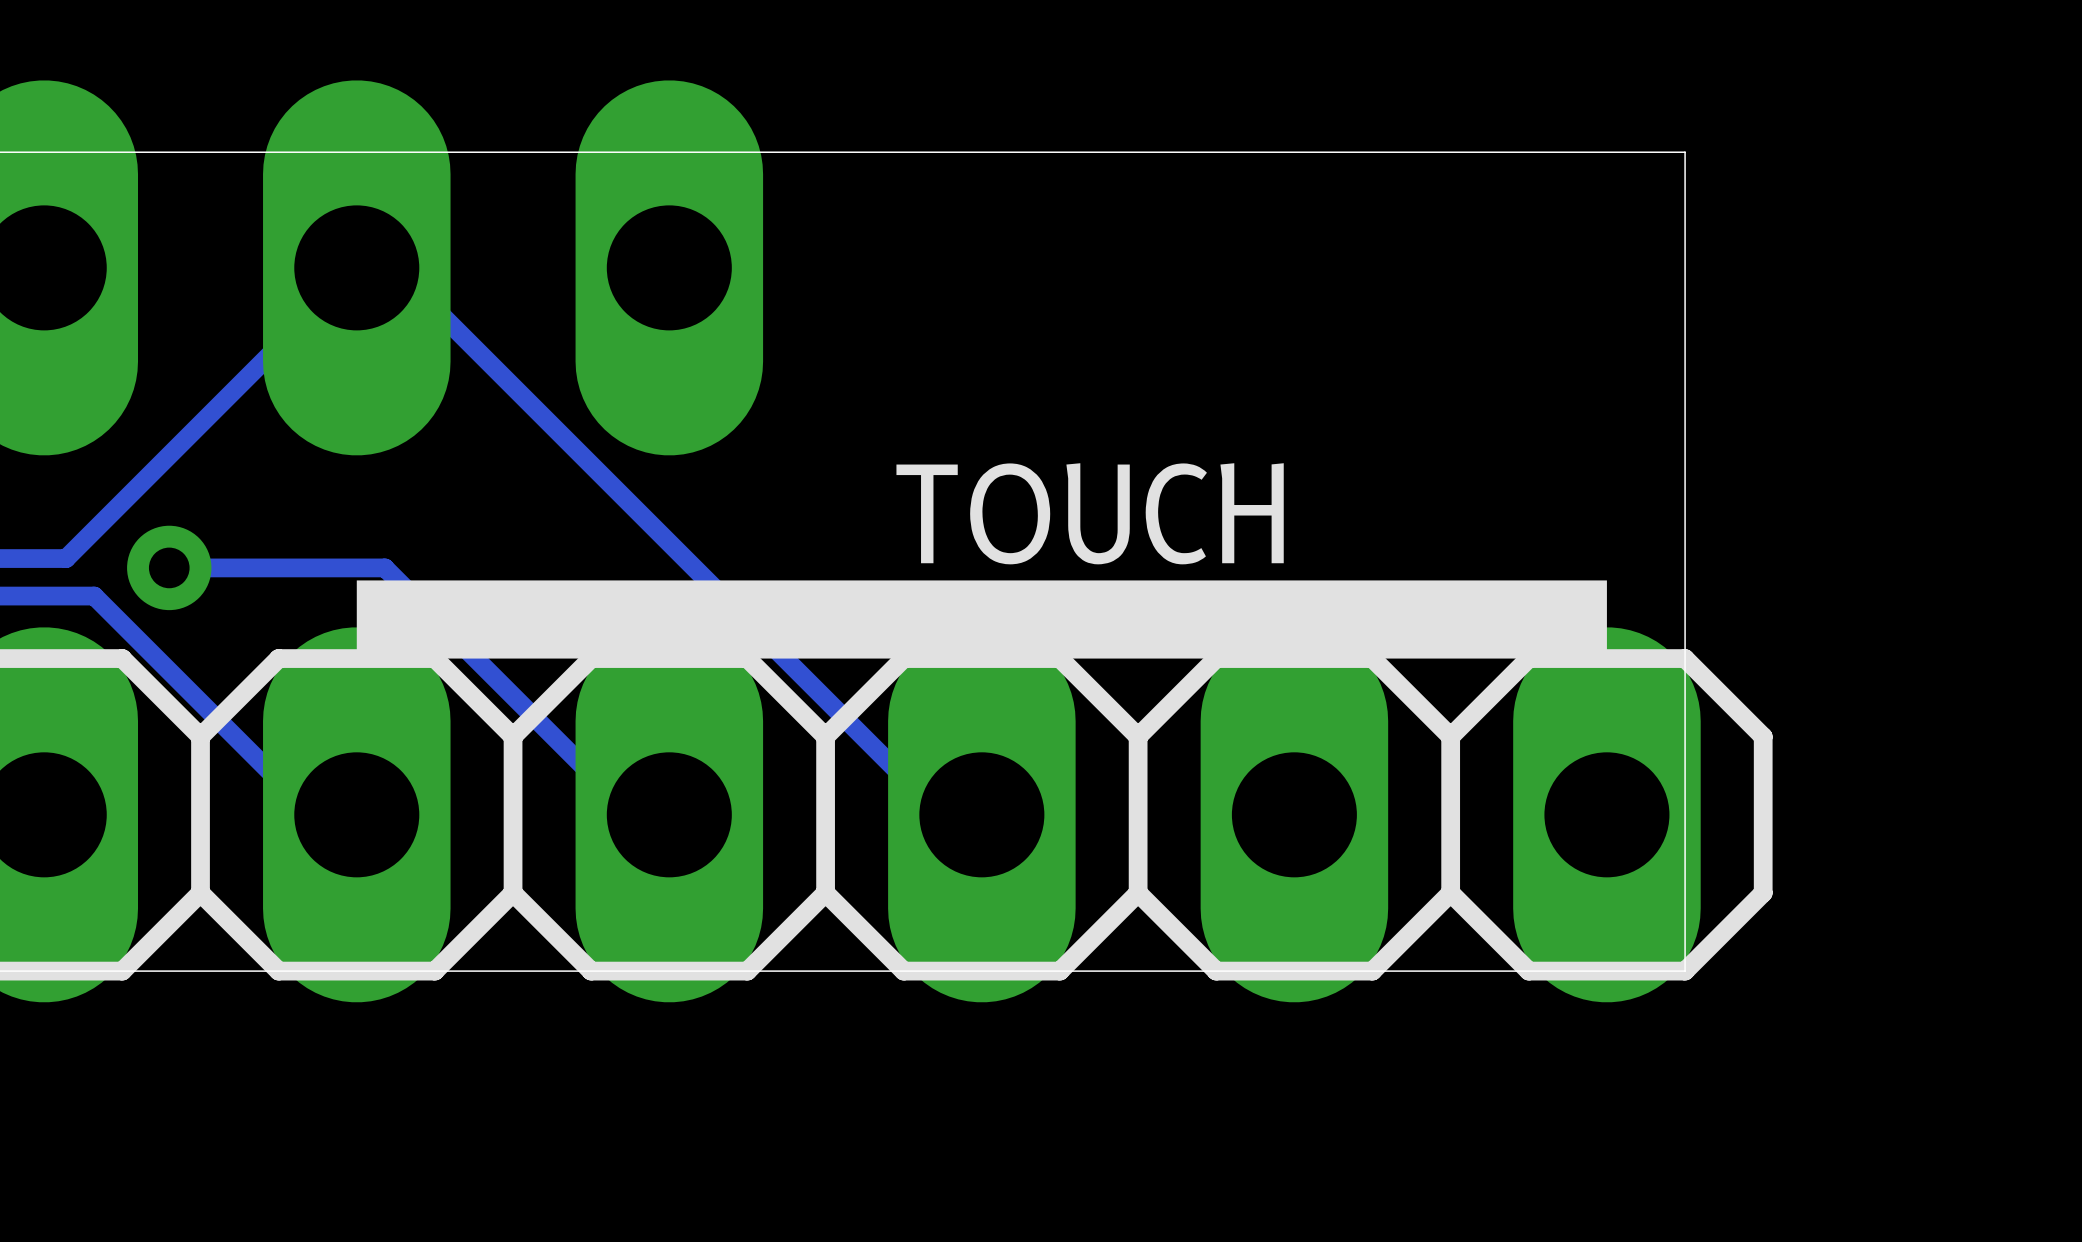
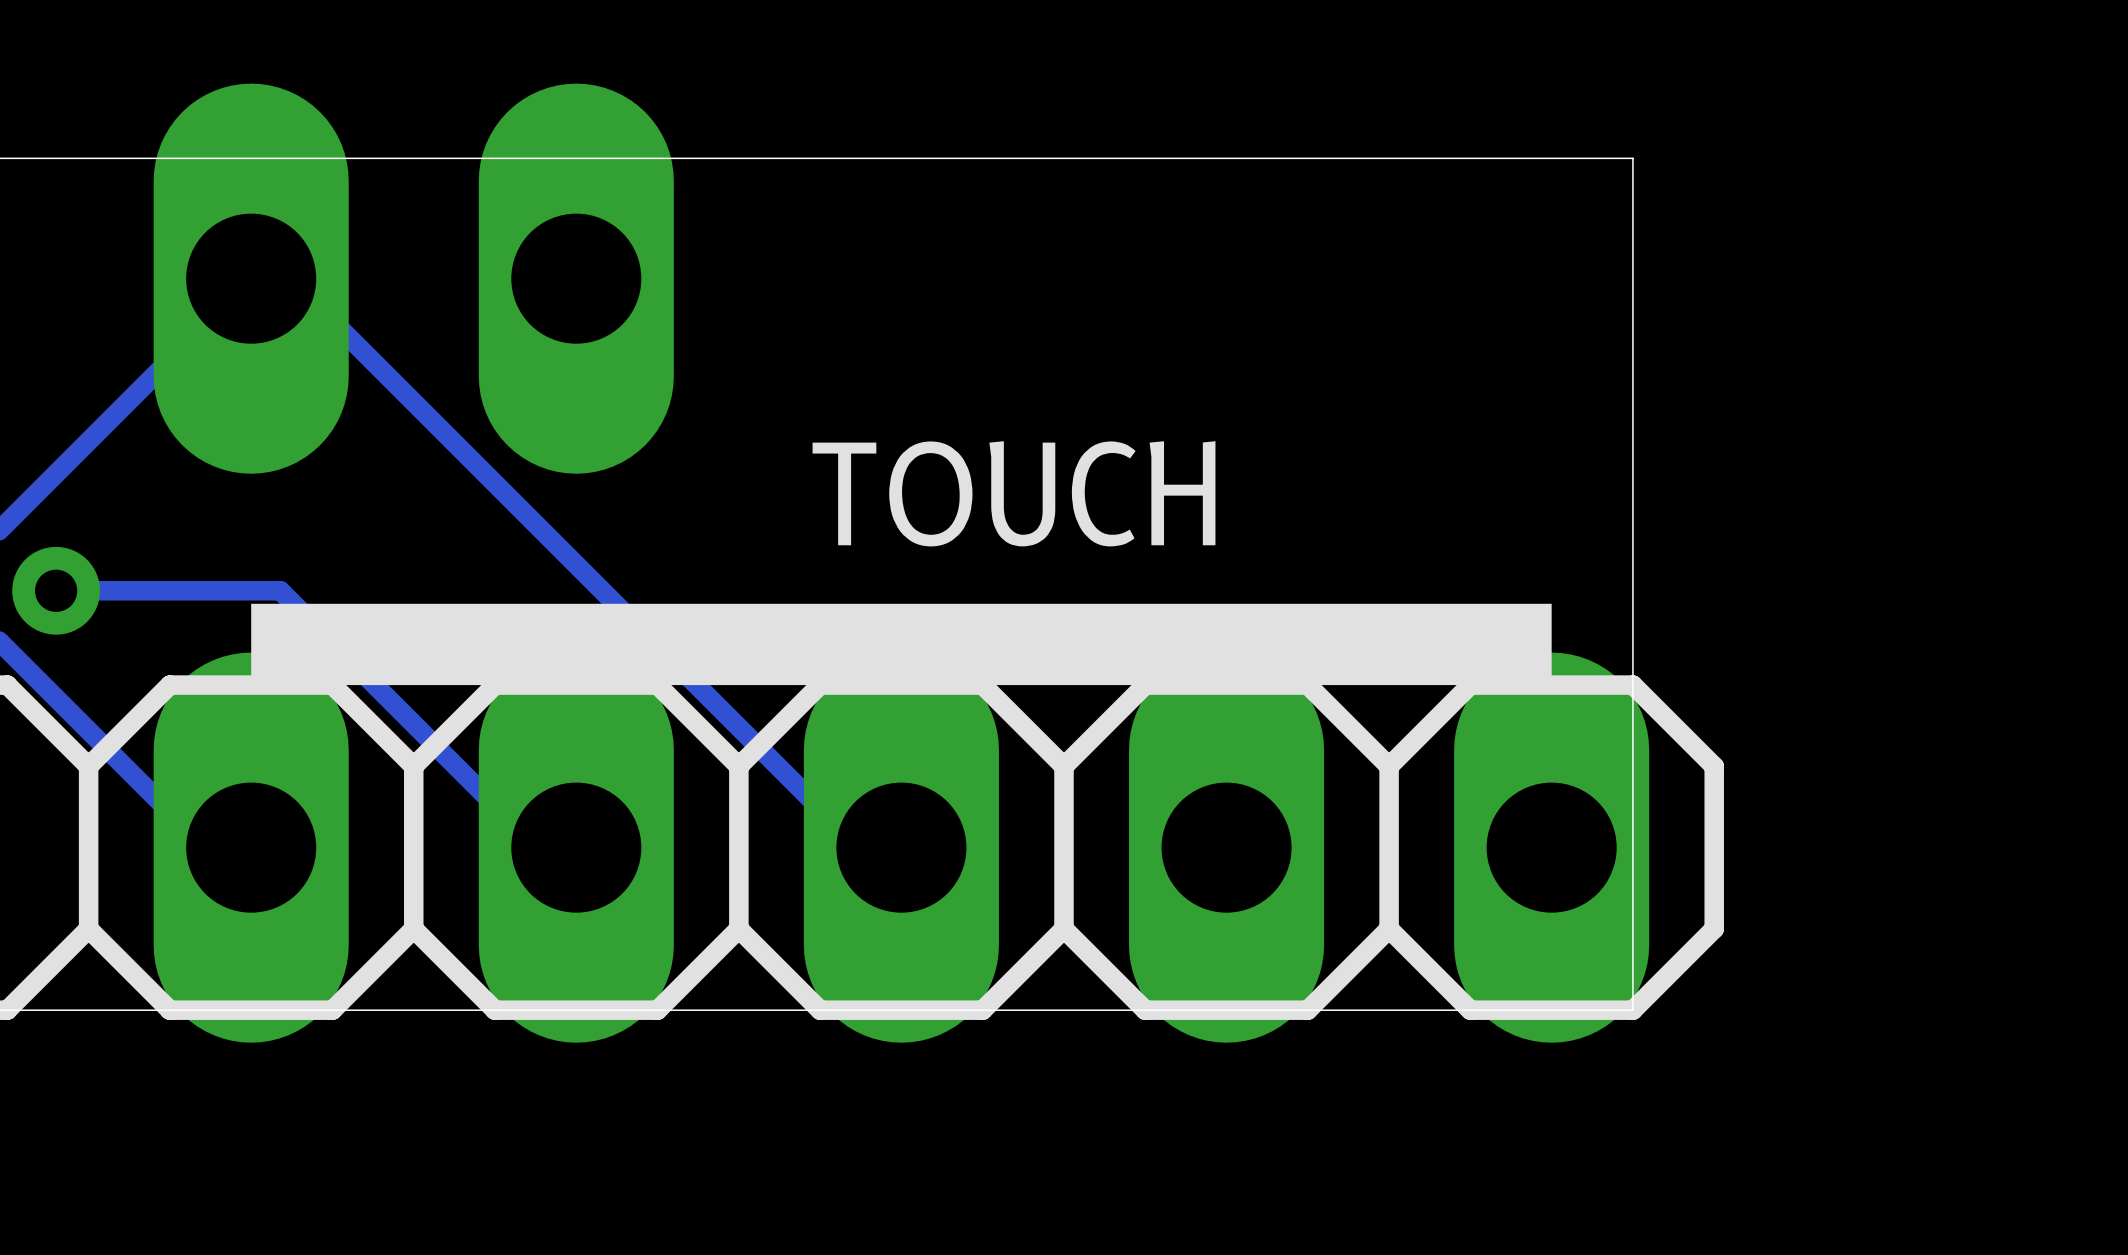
text position: TOUCH (1090, 513) -> TOUCH (1014, 493)

